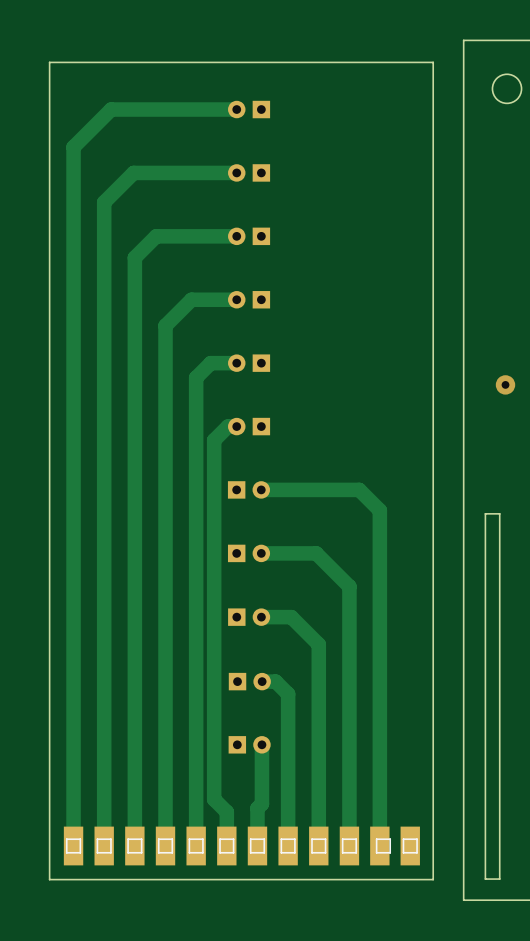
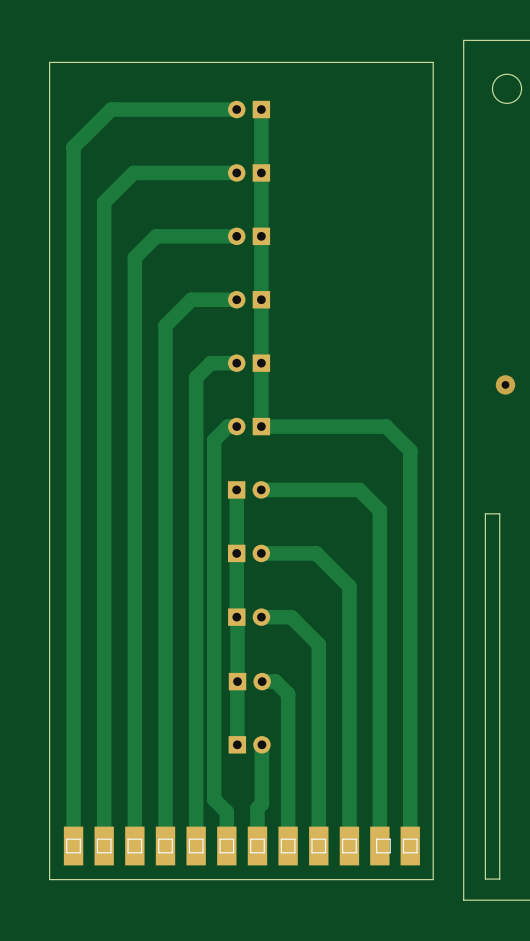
track: none -> (261, 109) (261, 426) (386, 426) (410, 450) (410, 845)
track: none -> (236, 489) (237, 744)

